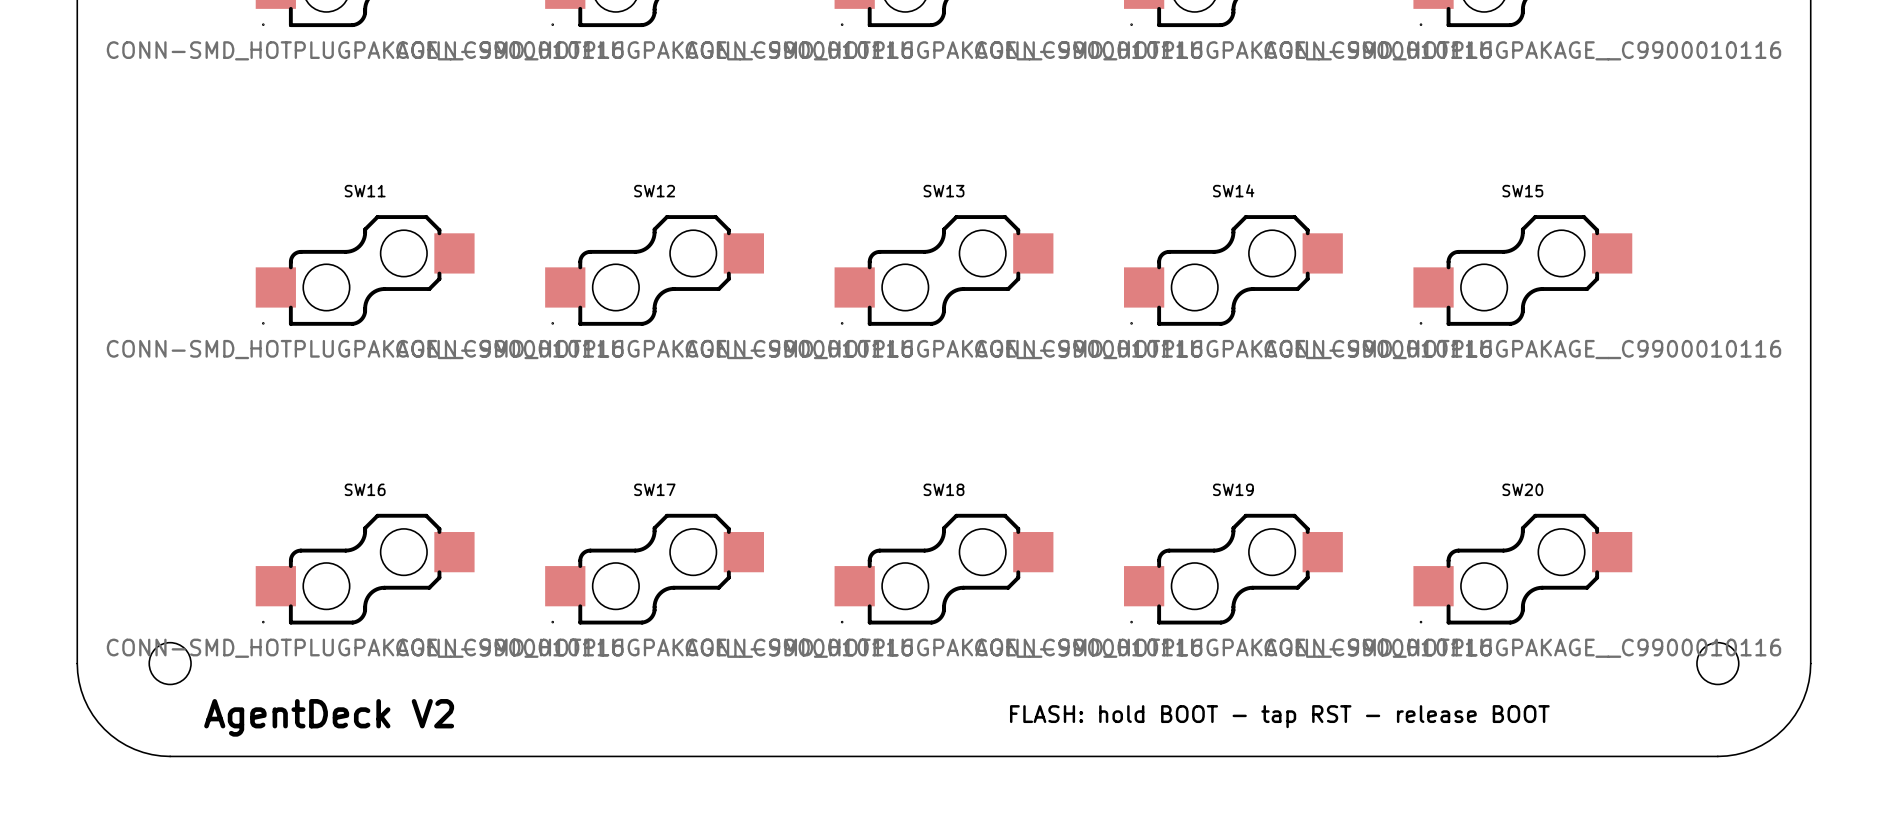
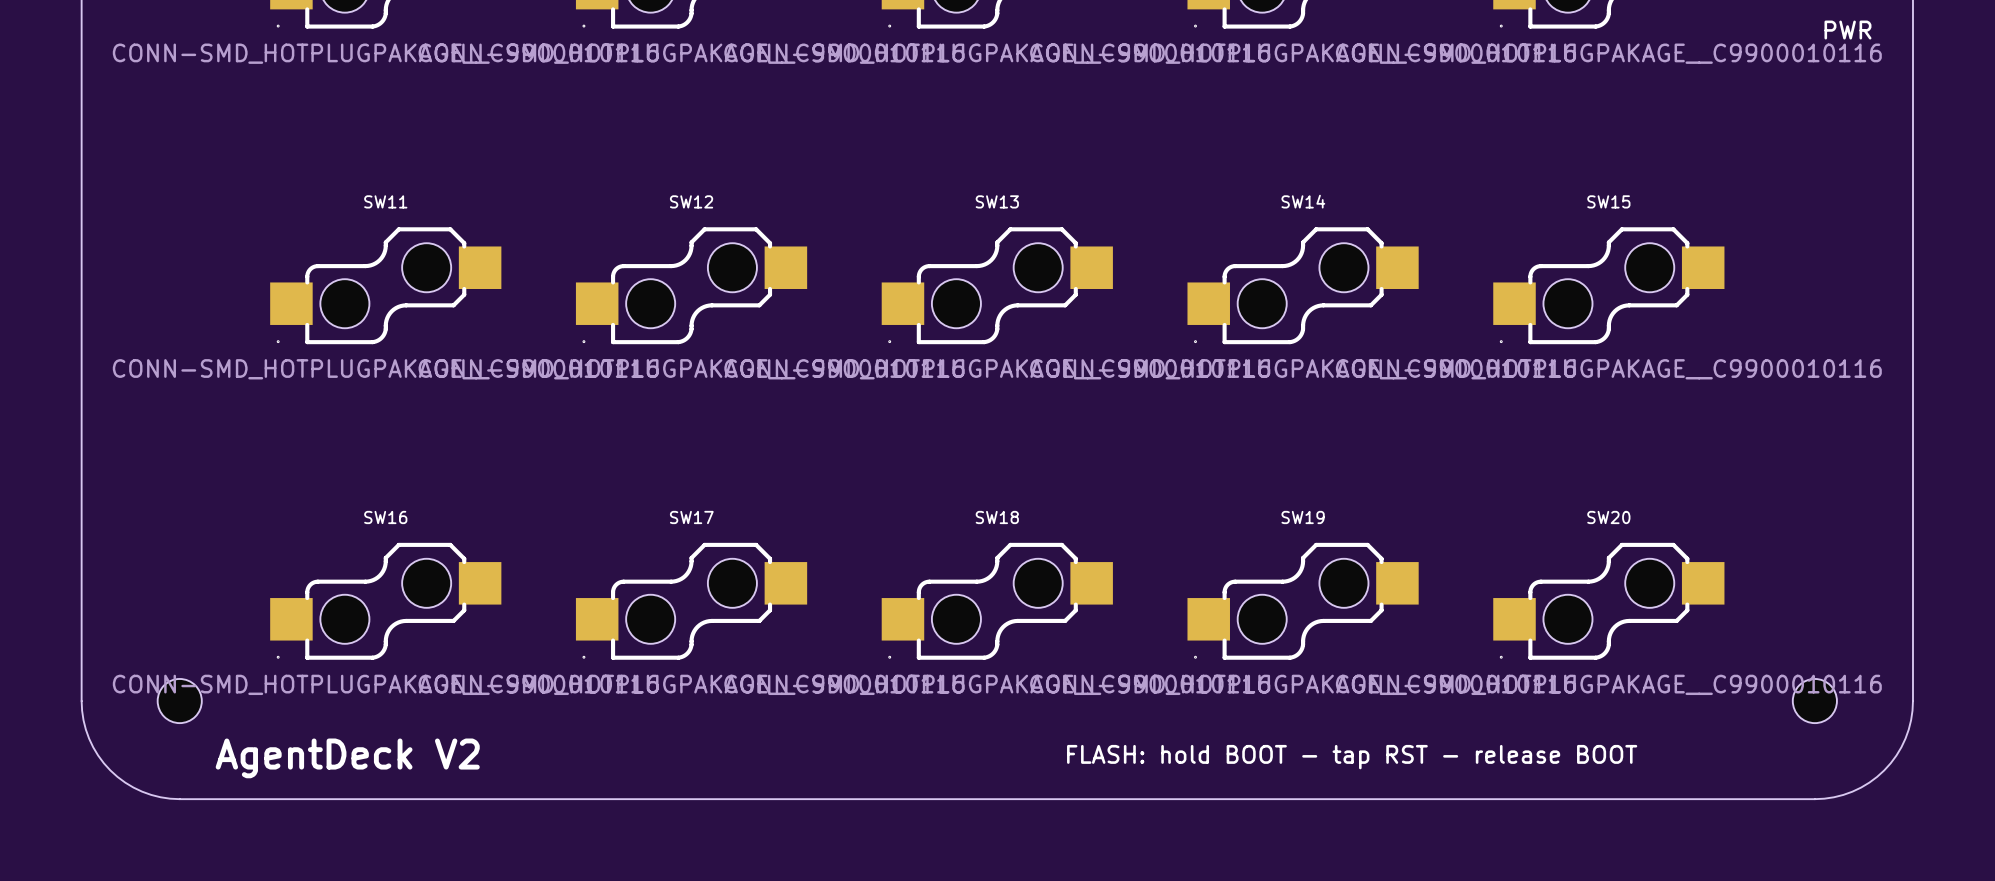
text: none -> PWR (1847, 30)

